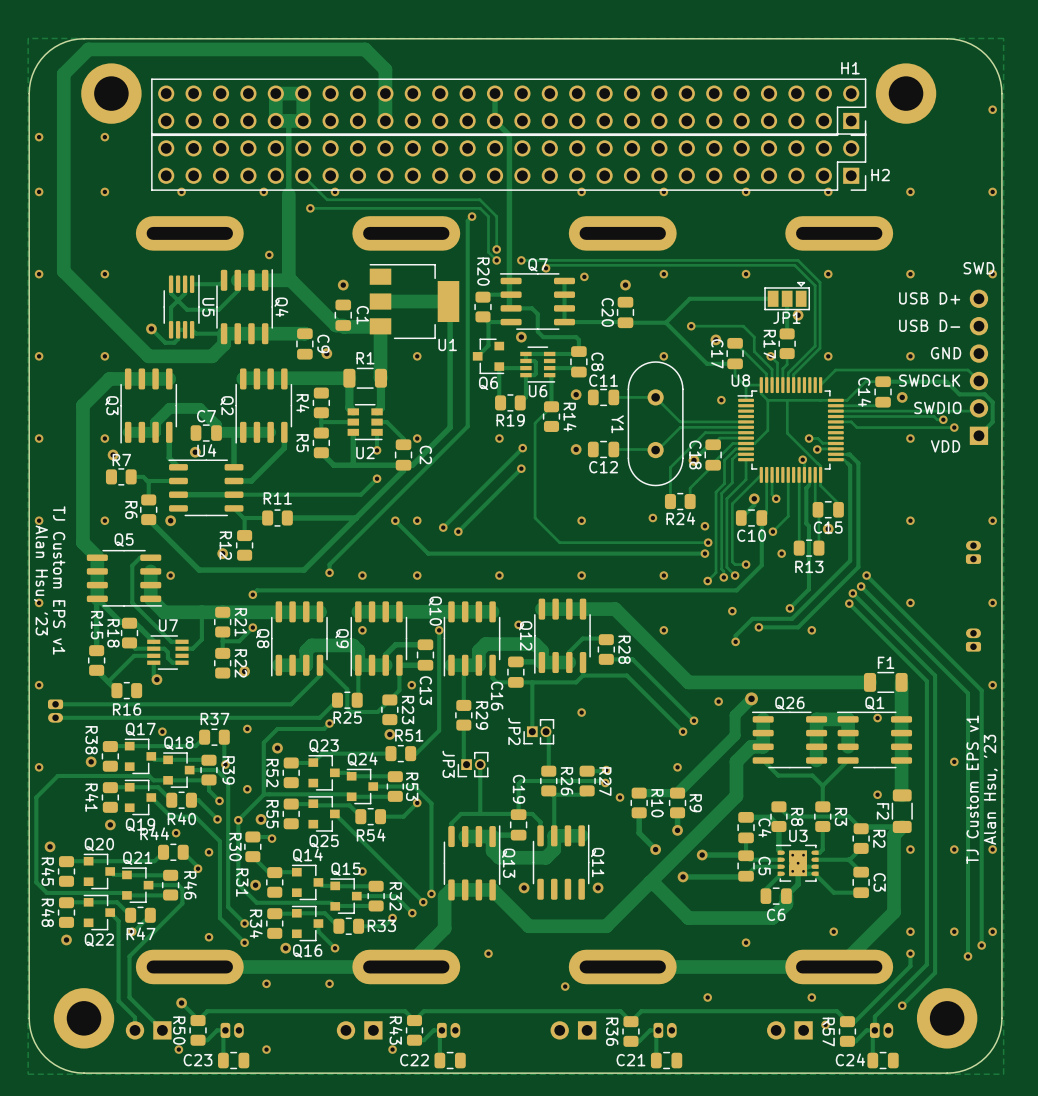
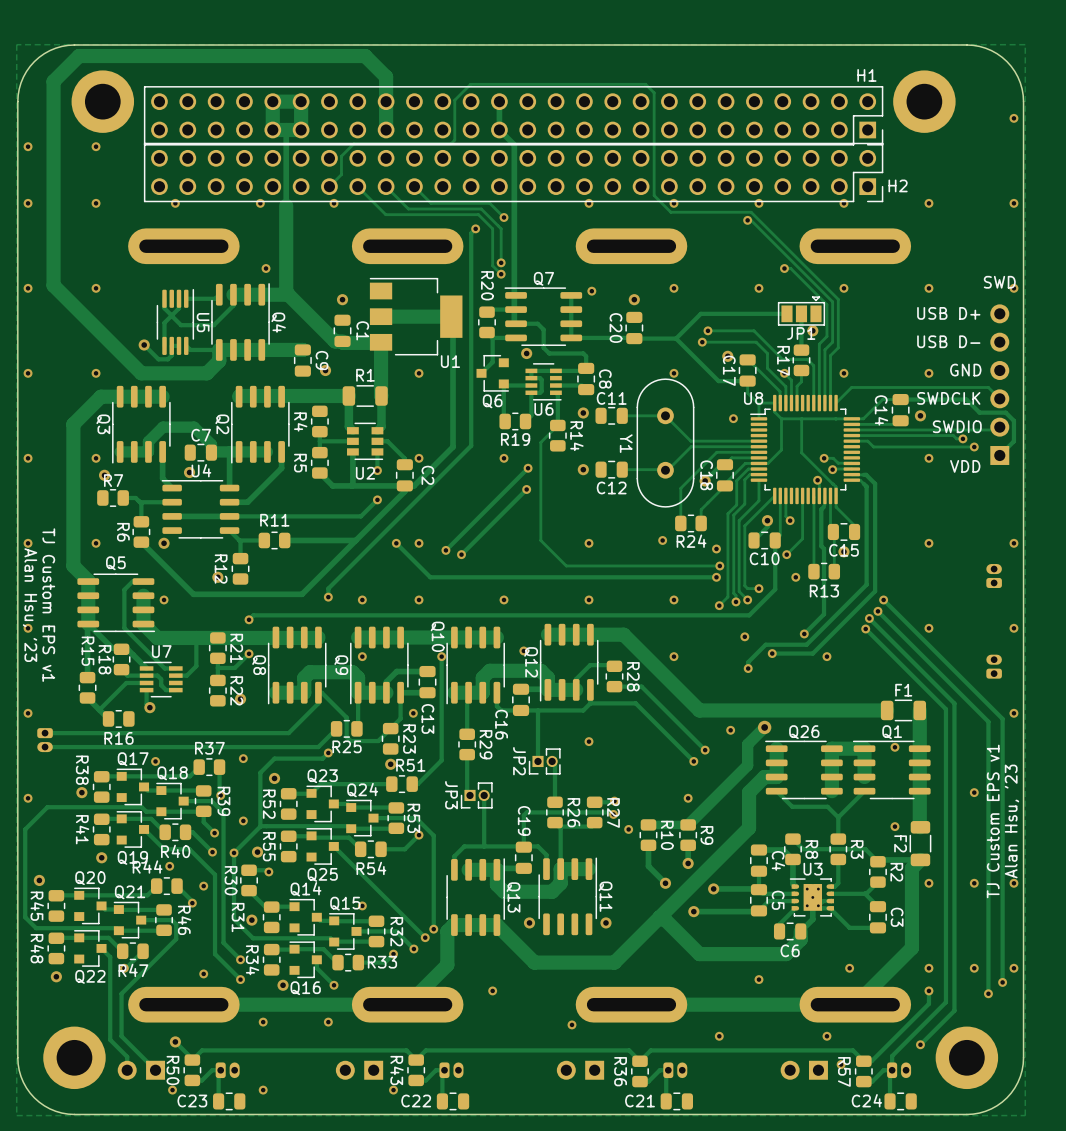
track: (303, 175) (327, 199) (479, 199) -> (386, 186) (408, 209) (481, 209) (483, 211)
track: none -> (329, 186) (341, 174) (341, 156) (353, 143) (450, 143) (454, 140) (454, 100) (470, 84) (645, 84) (654, 92) (654, 195) (670, 212) (751, 212) (838, 299) (838, 347) (830, 355) (830, 403)
track: none -> (414, 186) (431, 203) (489, 203) (504, 217)
via: none -> (504, 217)
via: (310, 208) -> none
track: (480, 208) (310, 208) -> (484, 220) (478, 214) (385, 214) (357, 186)
track: none -> (747, 220) (751, 220) (832, 301) (832, 342) (824, 349) (824, 403)
via: none -> (747, 220)
track: none -> (784, 268) (790, 268) (826, 304) (826, 336) (819, 344) (819, 403)
via: none -> (784, 268)
track: (521, 260) (798, 260) (820, 282) (820, 348) (793, 374) (793, 385) -> none
via: (521, 260) -> none
track: (546, 268) (548, 265) (794, 265) (815, 285) (815, 346) (788, 372) (788, 385) -> none
via: (546, 268) -> none
track: none -> (707, 330) (753, 330) (782, 359) (807, 359) (813, 365) (813, 403)
via: none -> (707, 330)

